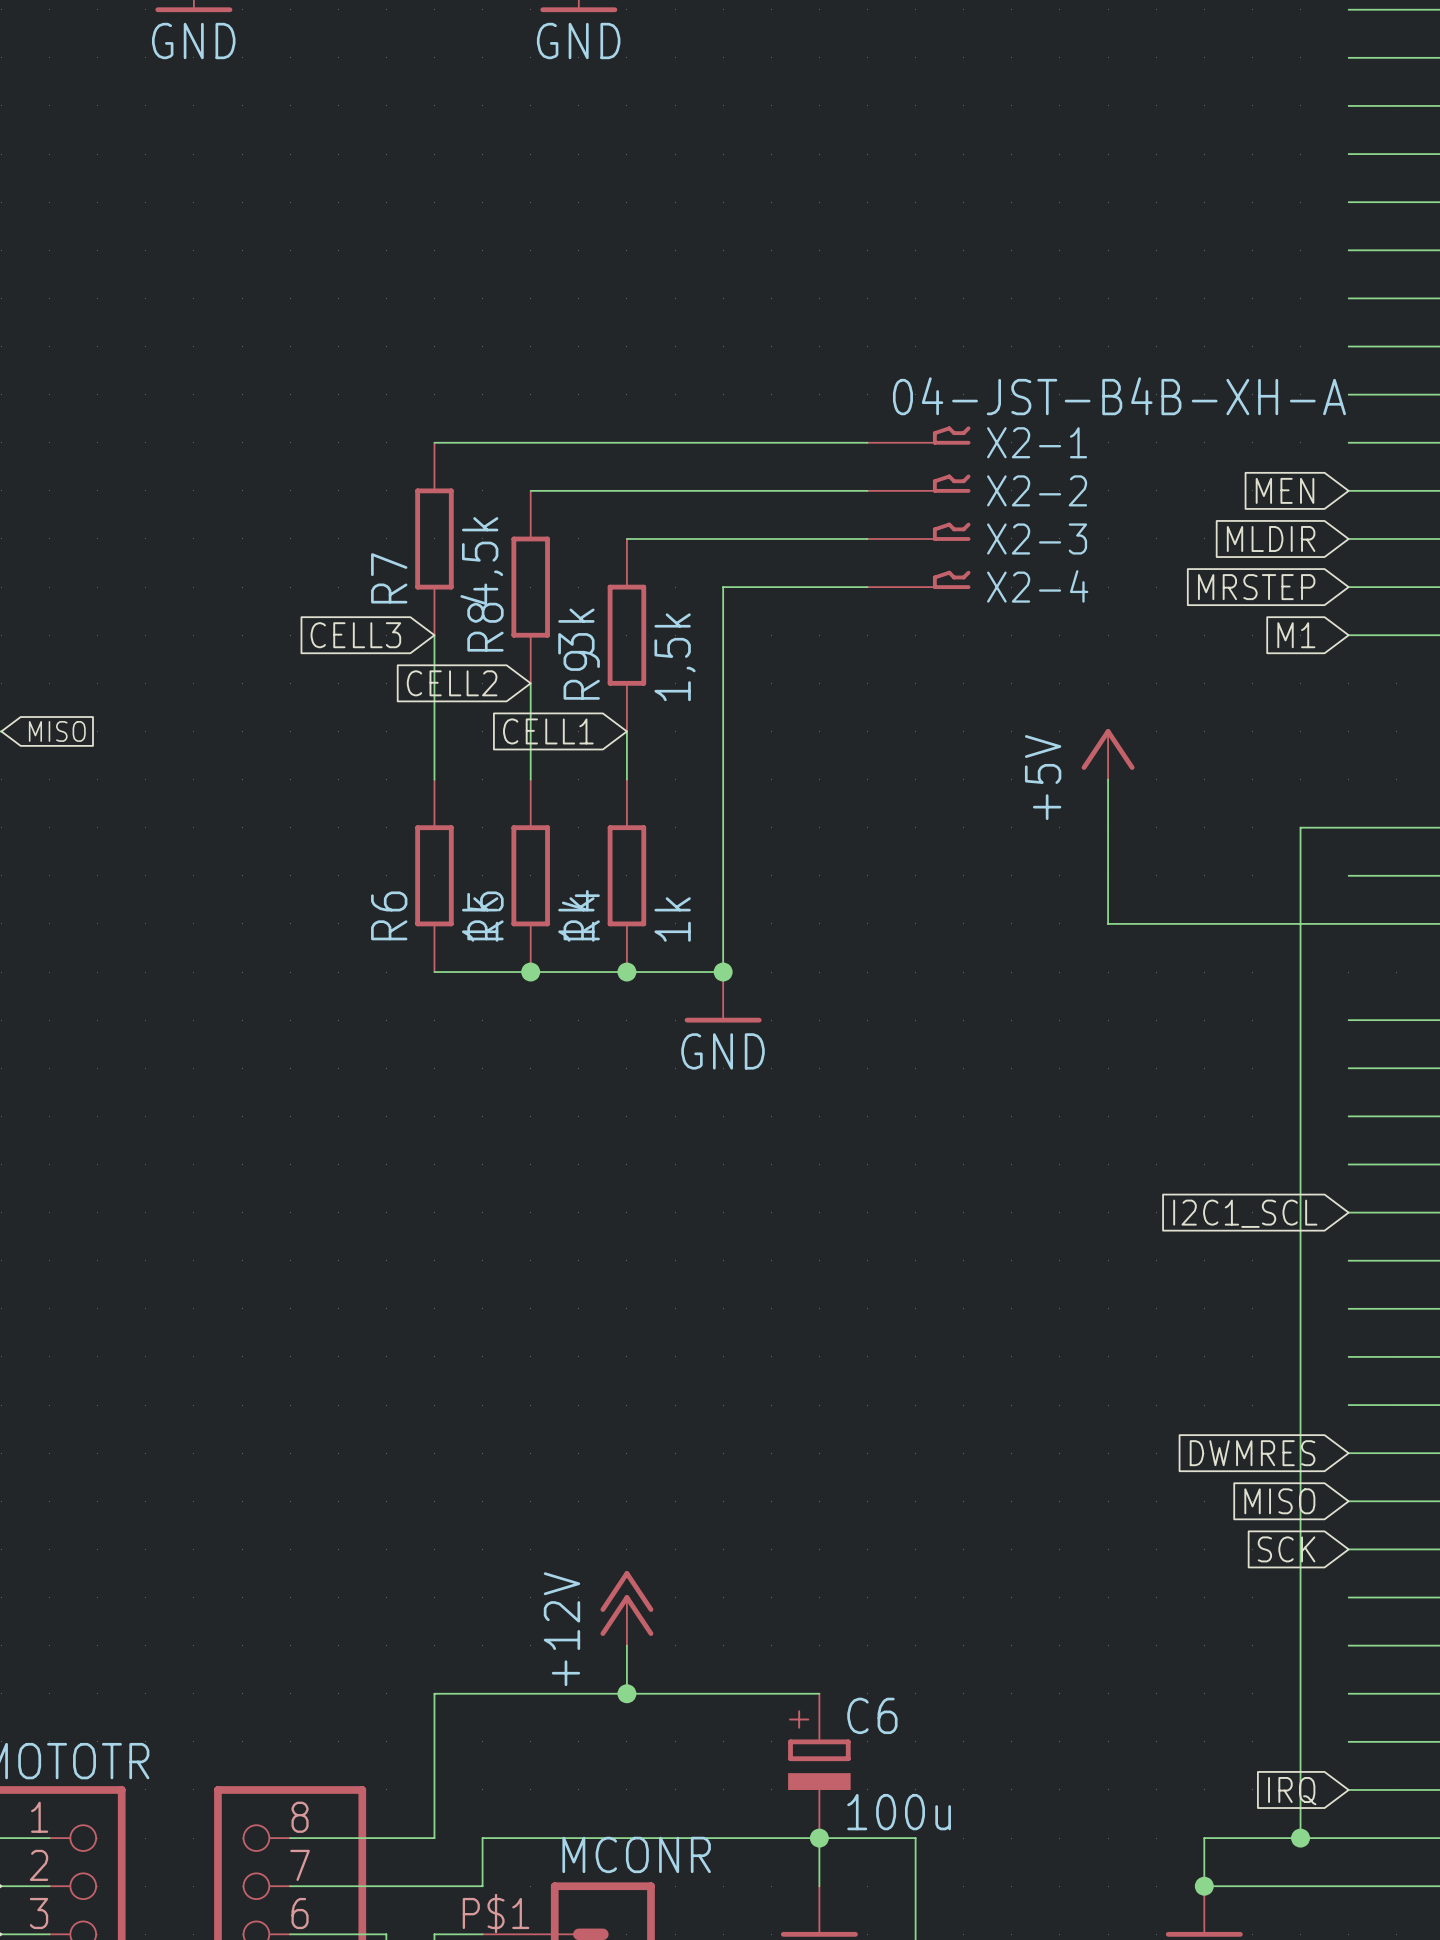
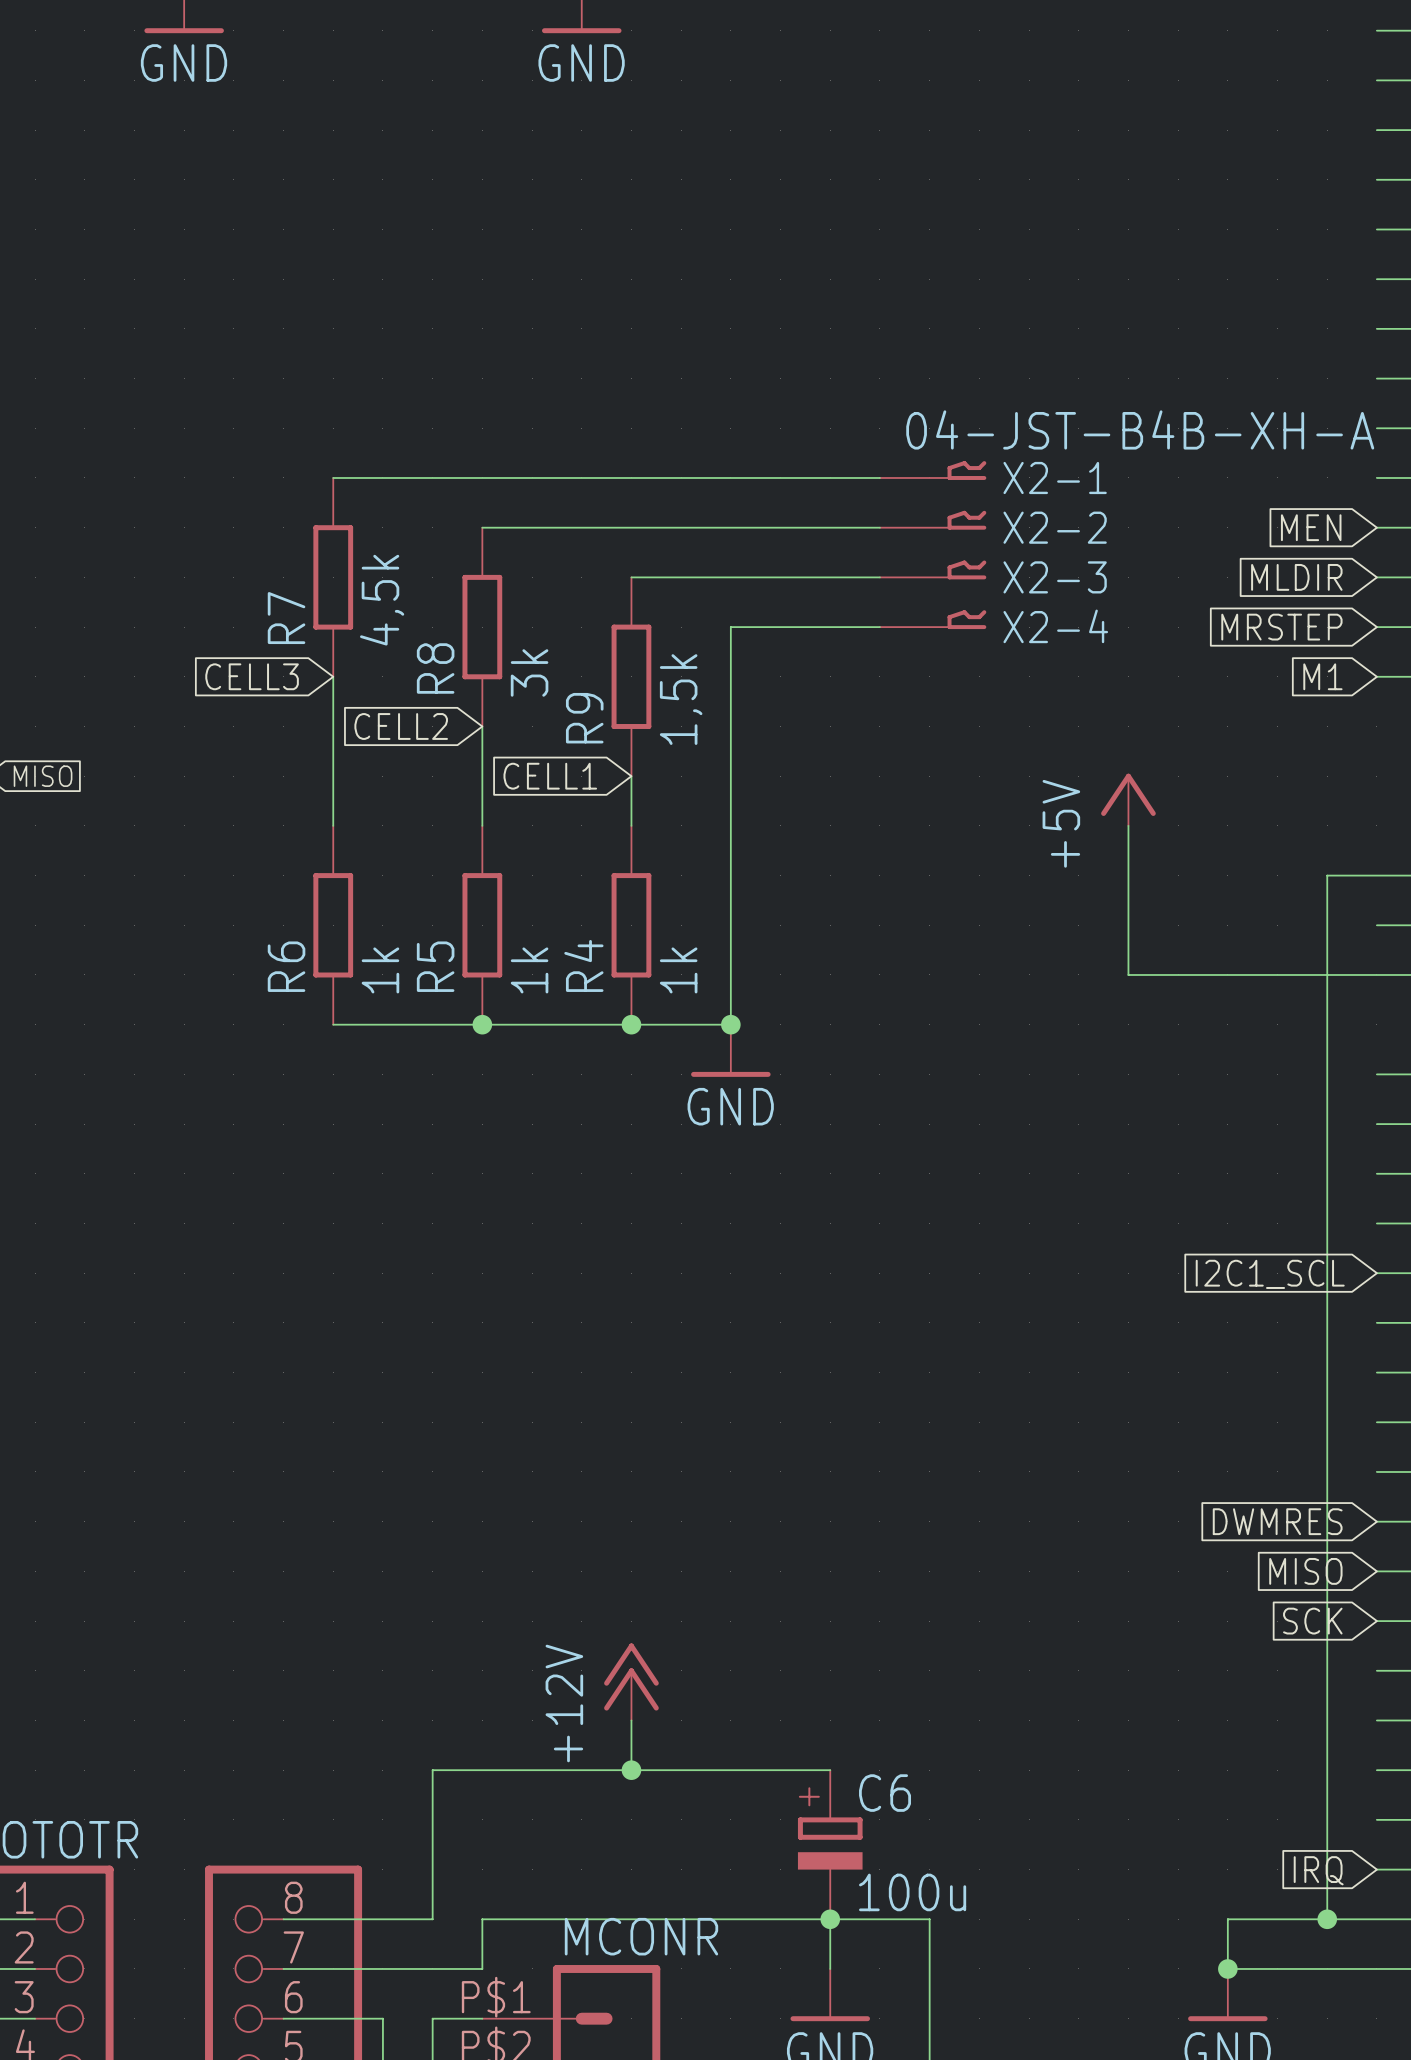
wire: none -> (333, 477) (432, 477)
wire: none -> (482, 527) (532, 527)
R7 position: (434, 538) -> (333, 577)
R8 position: (530, 587) -> (482, 627)
global label position: CELL3 (355, 635) -> CELL3 (252, 676)
wire: (434, 635) (434, 779) -> (333, 676) (333, 825)
global label position: CELL2 (452, 683) -> CELL2 (401, 726)
wire: (530, 683) (530, 779) -> (482, 726) (482, 825)
R6 position: (434, 875) -> (333, 925)
R5 position: (530, 875) -> (482, 925)
wire: none -> (333, 1024) (432, 1024)
junction position: (530, 972) -> (482, 1024)

